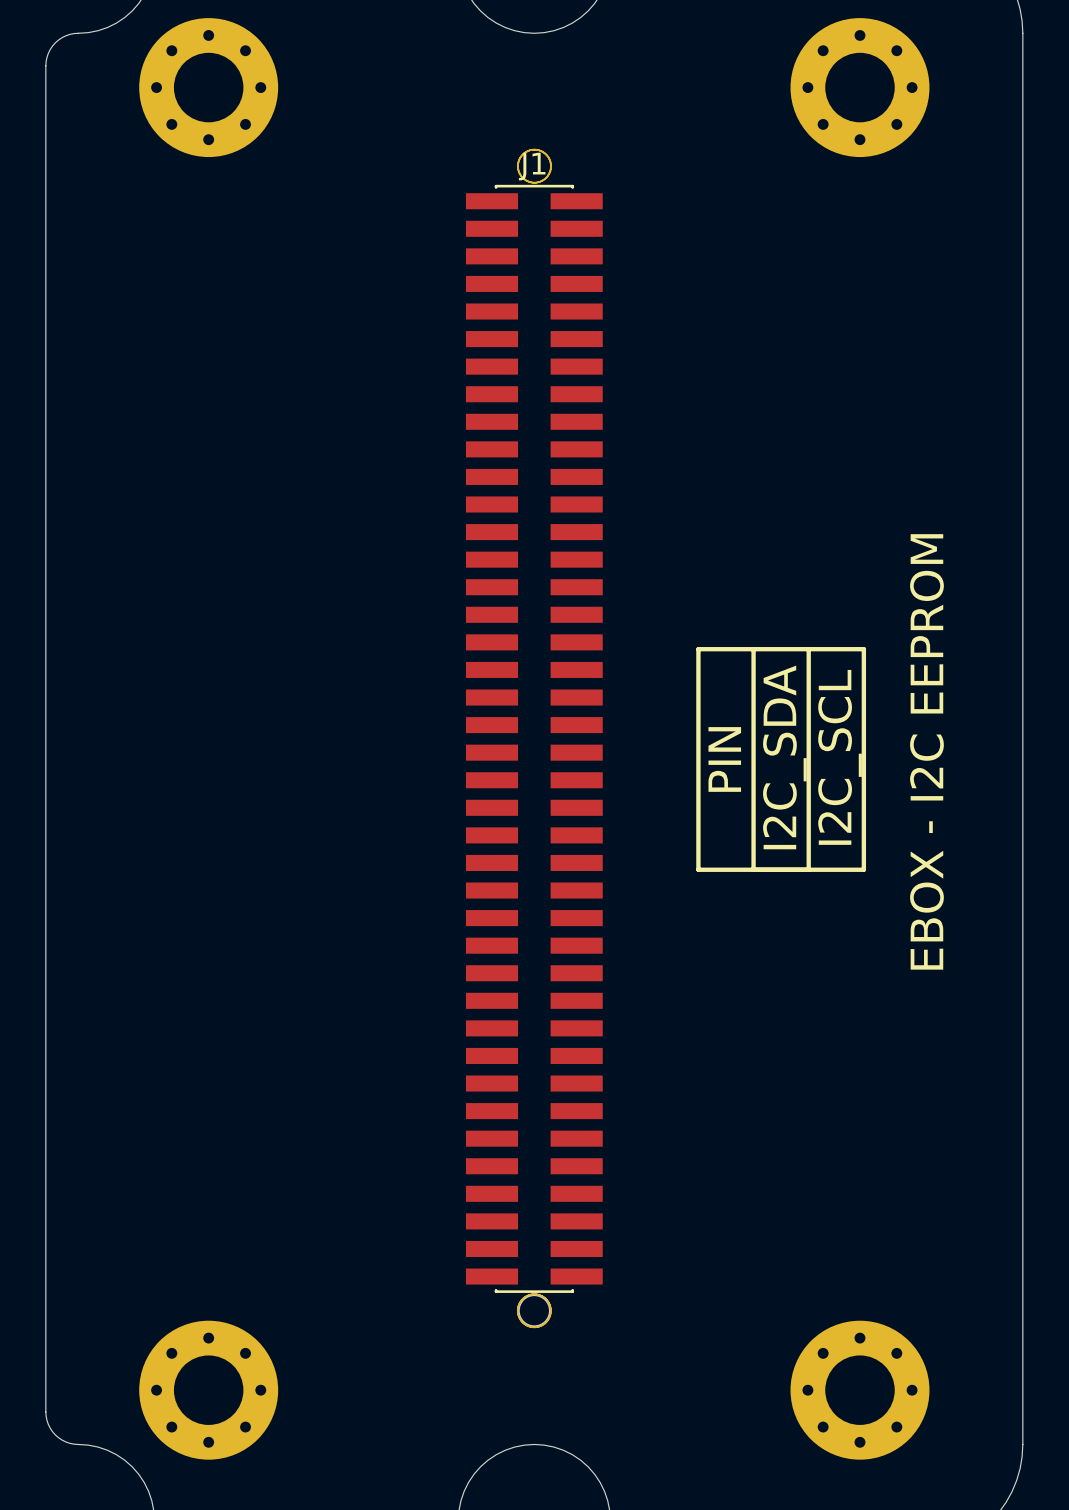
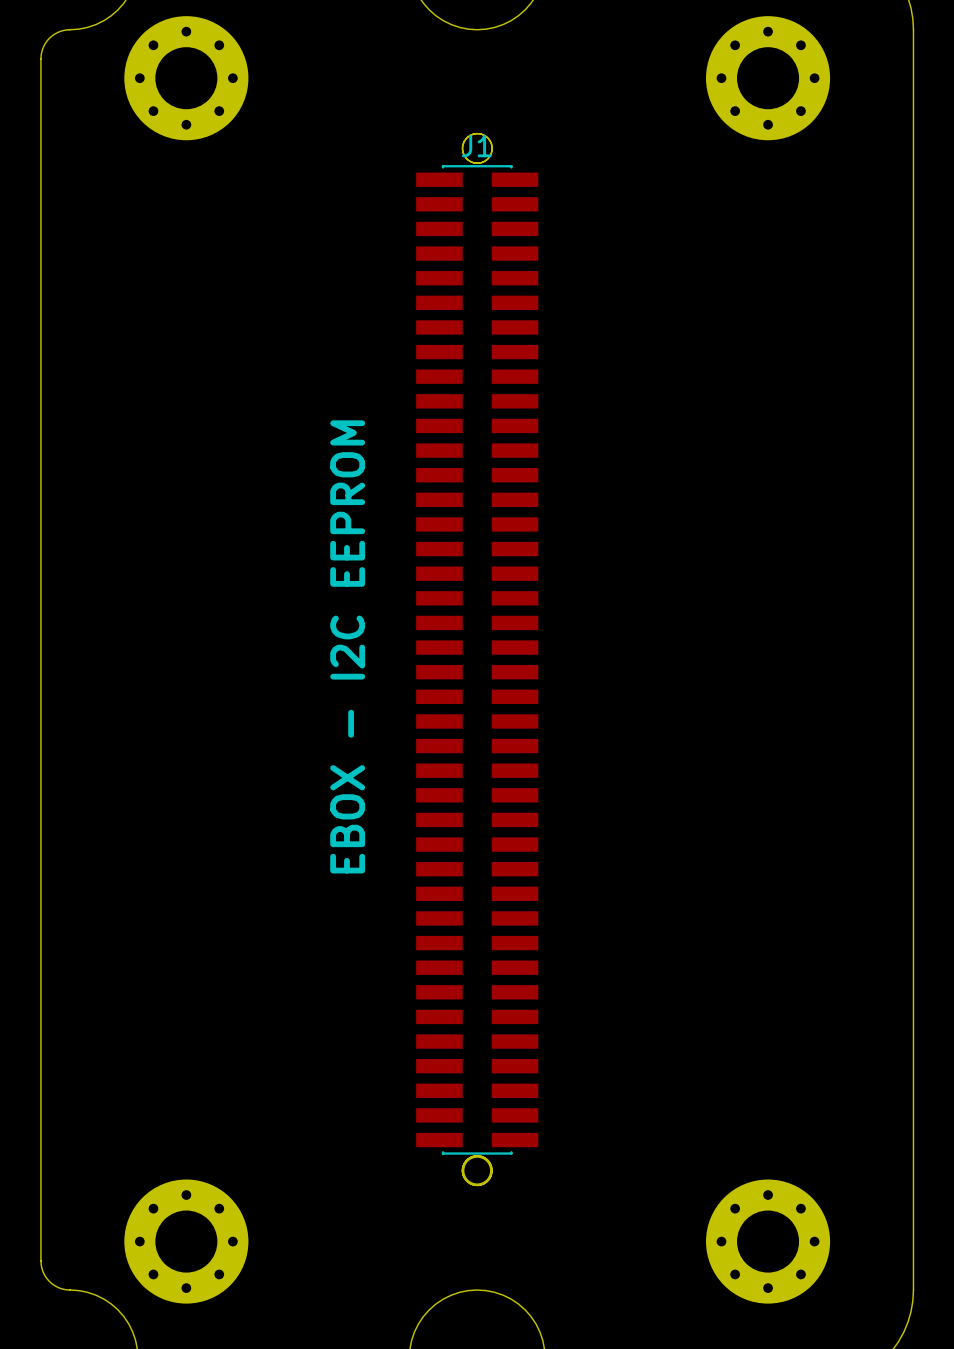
line: (698, 649) (863, 649) (863, 869) (698, 869) (698, 649) -> none
line: (753, 649) (753, 869) -> none
line: (808, 649) (808, 869) -> none
text position: EBOX - I2C EEPROM (926, 751) -> EBOX - I2C EEPROM (347, 646)
text: I2C_SDA (784, 757) -> none
text: I2C_SCL (840, 757) -> none
text: PIN (724, 759) -> none

